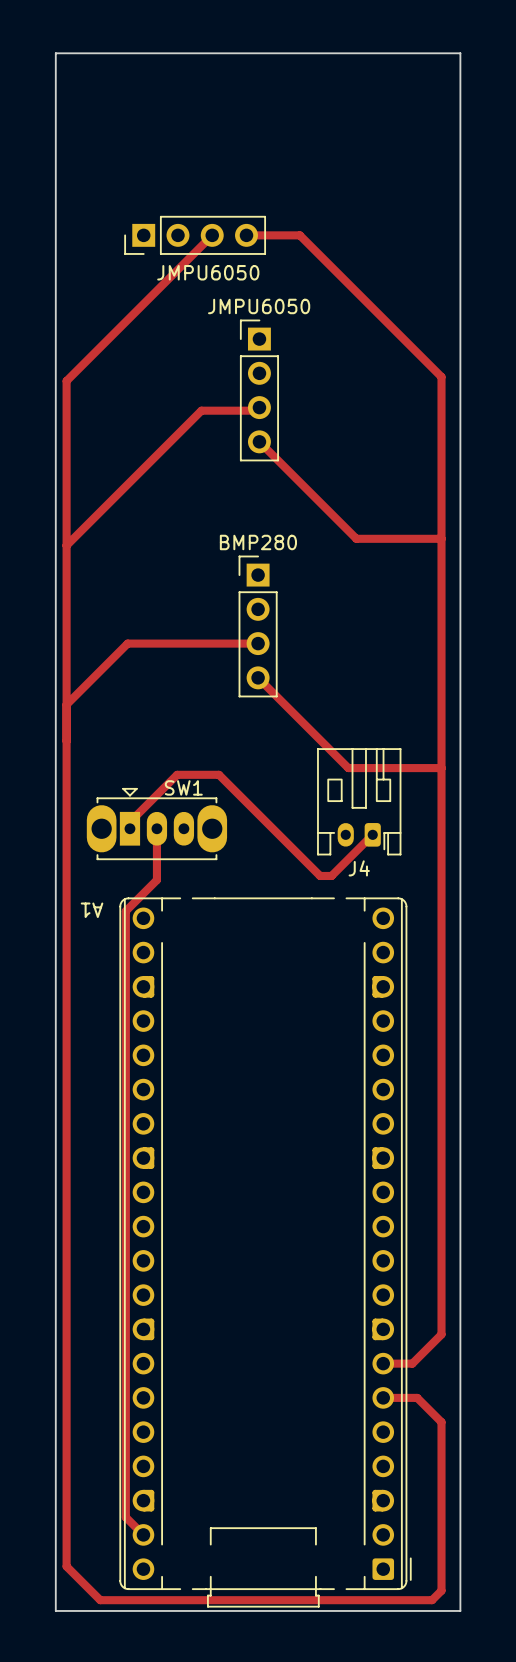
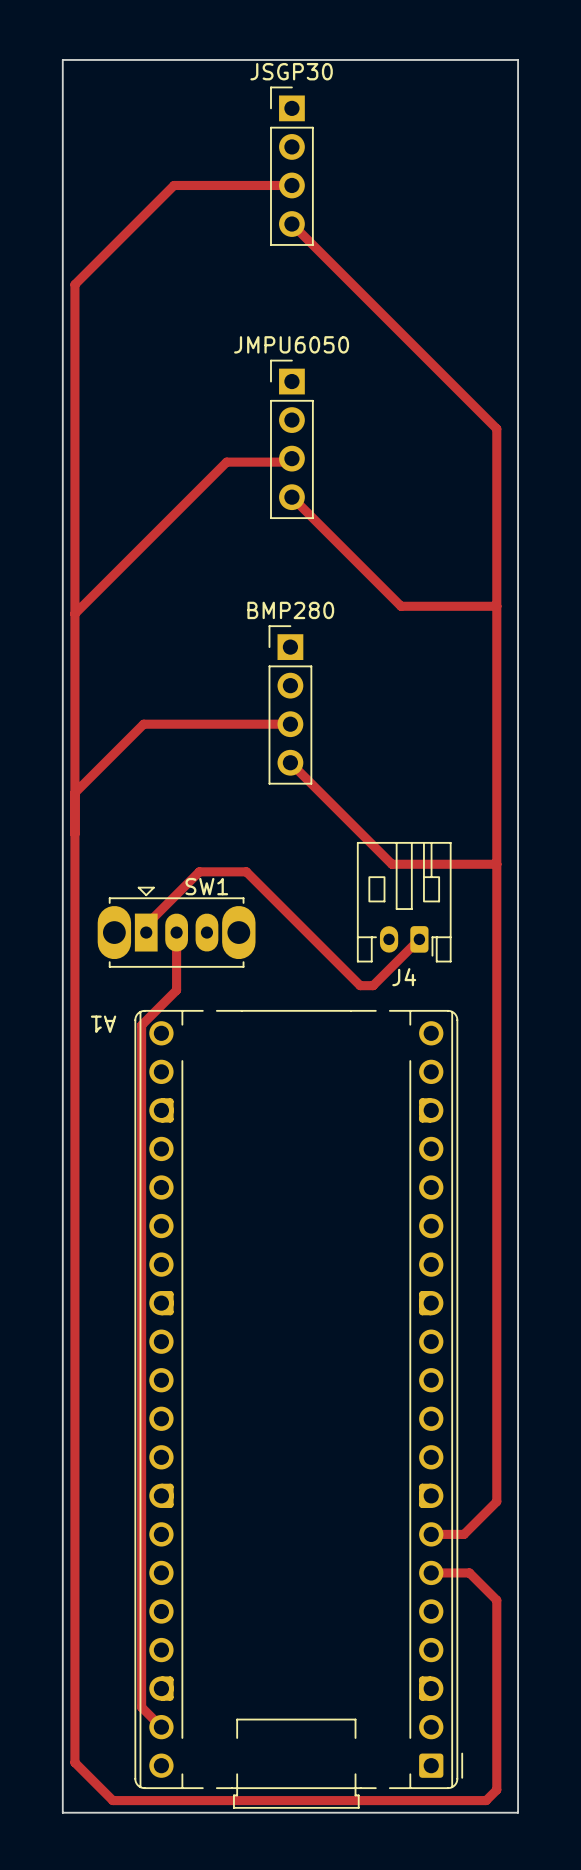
JSGP30: none -> (291, 166)
JMPU6050: (195, 235) -> none
track: (212, 235) (66, 381) -> (291, 185) (174, 185) (74, 284) (74, 428)
track: (246, 235) (299, 235) (441, 376) (441, 381) -> (291, 224) (496, 428)

